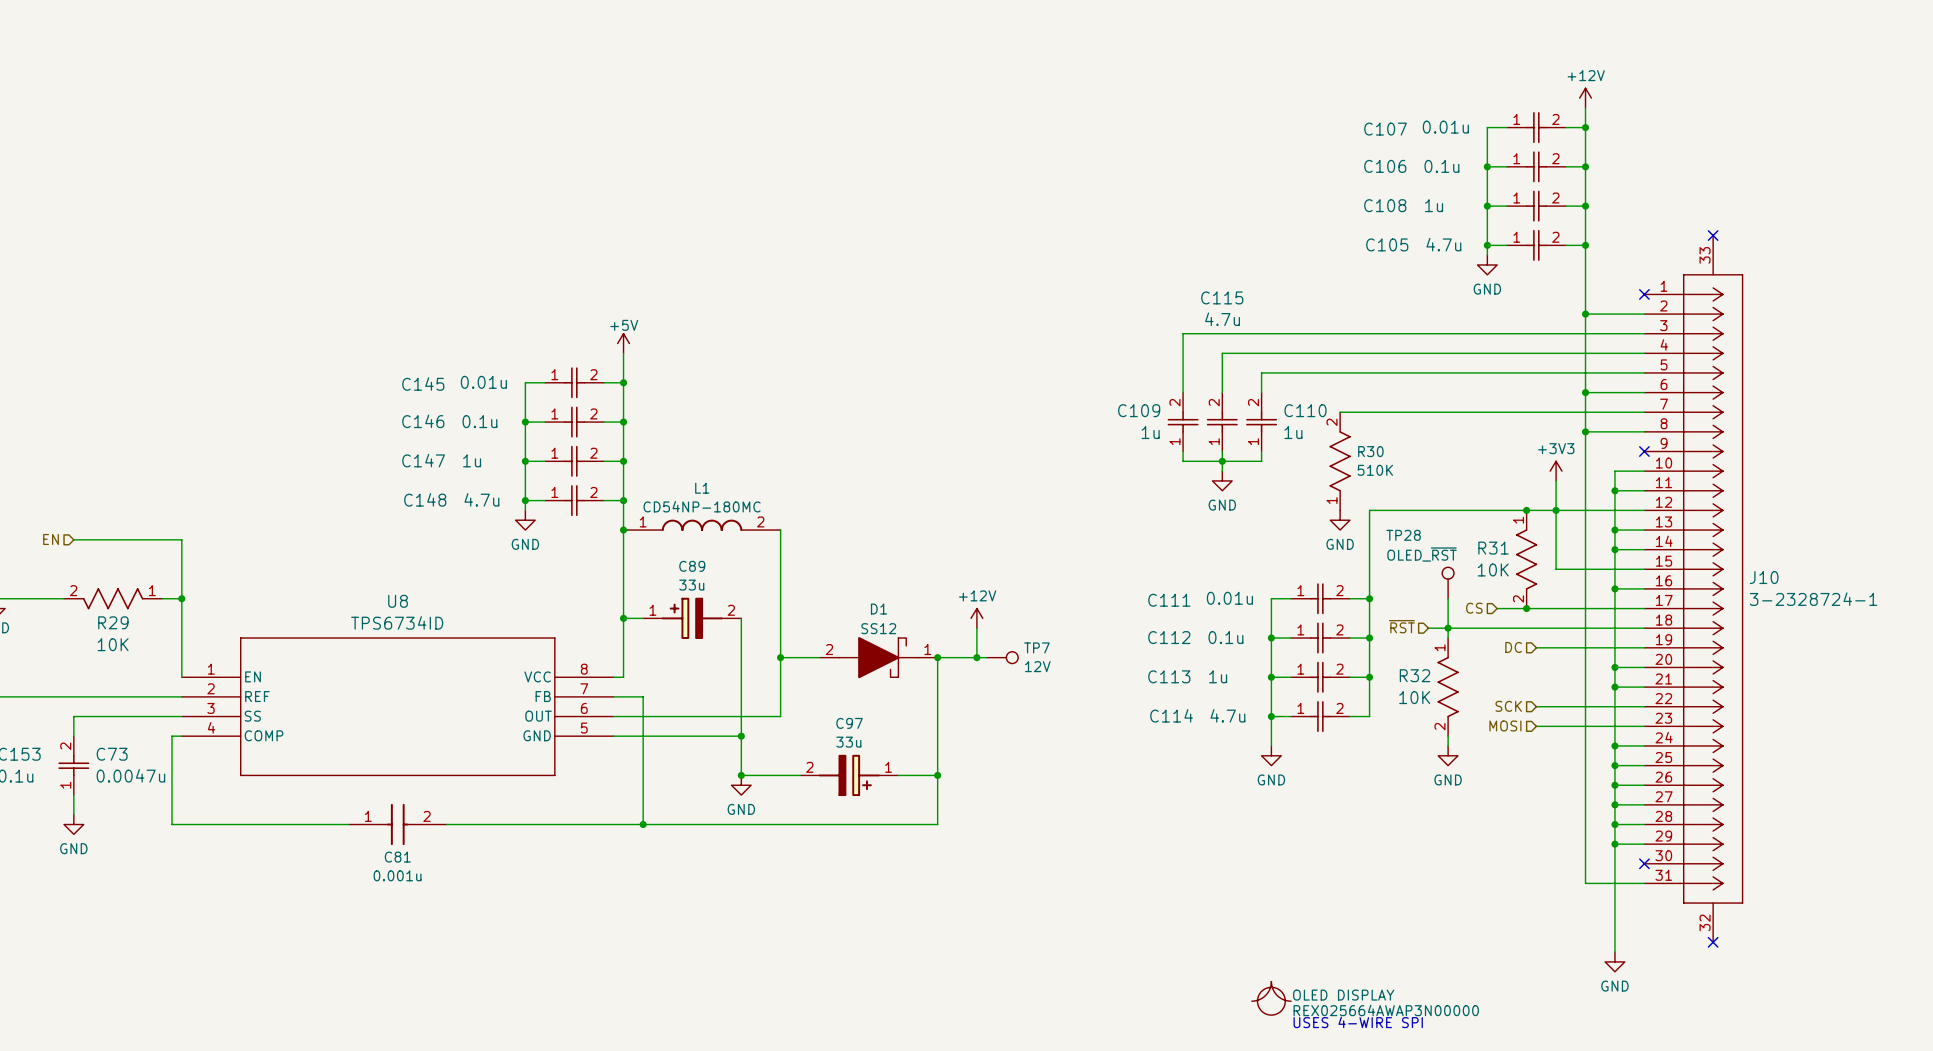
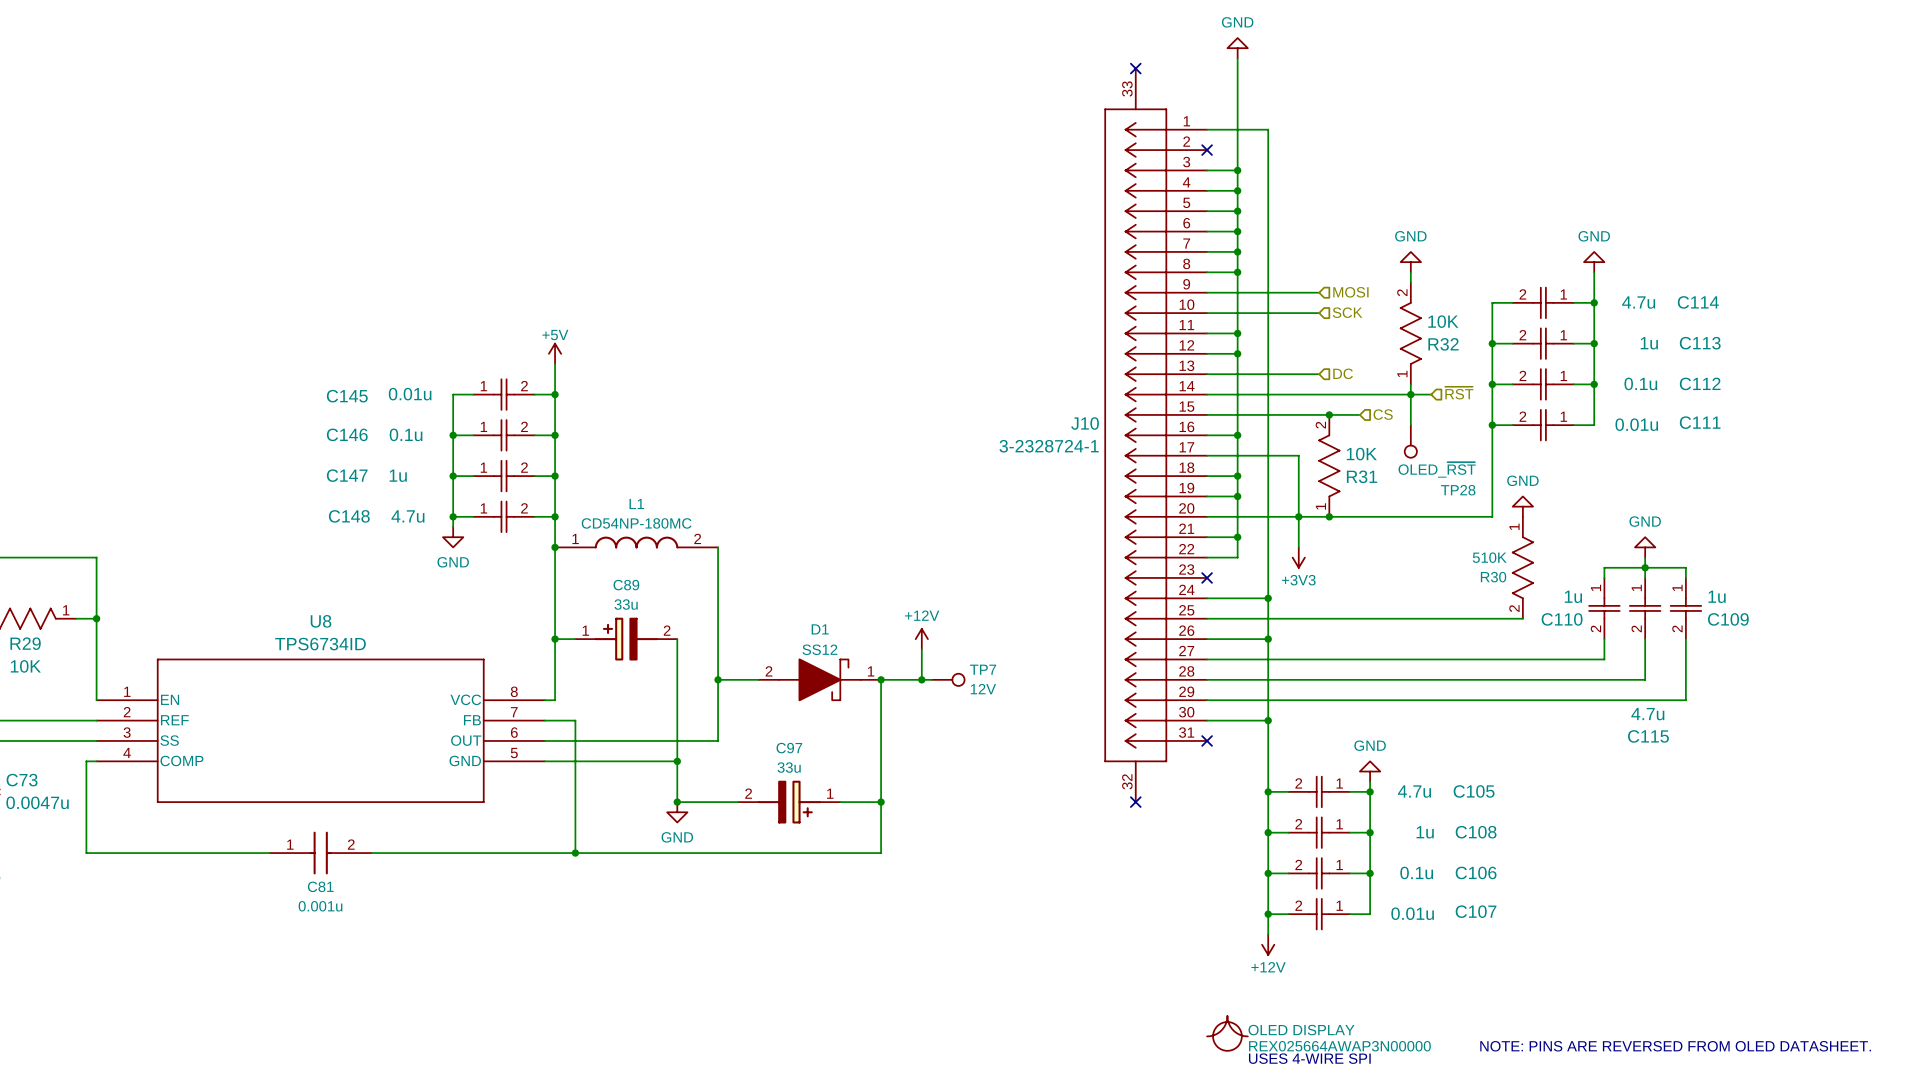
power symbol: none -> GND (1237, 48)
wire: none -> (1237, 58) (1237, 557) (1207, 557)
no-connect mark: none -> (1135, 68)
power symbol: +12V (1585, 98) -> none
wire: (1585, 107) (1585, 883) (1644, 883) -> none
wire: none -> (1207, 129) (1268, 129) (1268, 934)
wire: (1506, 127) (1487, 127) (1487, 255) -> none
C107 rotation: 0° (1536, 127) -> 180° (1319, 914)
C107 position: (1536, 127) -> (1319, 914)
wire: (1565, 127) (1585, 127) -> none
junction: (1585, 127) -> none
no-connect mark: none -> (1207, 150)
wire: none -> (1207, 170) (1237, 170)
junction: none -> (1237, 170)
wire: (1487, 166) (1506, 166) -> none
junction: (1487, 166) -> none
C106 rotation: 0° (1536, 166) -> 180° (1319, 873)
C106 position: (1536, 166) -> (1319, 873)
wire: (1565, 166) (1585, 166) -> none
junction: (1585, 166) -> none
wire: none -> (1207, 190) (1237, 190)
junction: none -> (1237, 190)
wire: none -> (1207, 211) (1237, 211)
junction: none -> (1237, 211)
wire: (1487, 206) (1506, 206) -> none
junction: (1487, 206) -> none
C108 rotation: 0° (1536, 206) -> 180° (1319, 832)
C108 position: (1536, 206) -> (1319, 832)
wire: (1565, 206) (1585, 206) -> none
junction: (1585, 206) -> none
wire: none -> (1207, 231) (1237, 231)
junction: none -> (1237, 231)
no-connect mark: (1713, 235) -> none
wire: none -> (1207, 251) (1237, 251)
junction: none -> (1237, 251)
wire: (1487, 245) (1506, 245) -> none
junction: (1487, 245) -> none
C105 rotation: 0° (1536, 245) -> 180° (1319, 791)
C105 position: (1536, 245) -> (1319, 791)
wire: (1565, 245) (1585, 245) -> none
junction: (1585, 245) -> none
power symbol: none -> GND (1594, 262)
wire: none -> (1207, 272) (1237, 272)
junction: none -> (1237, 272)
wire: none -> (1410, 272) (1410, 282)
power symbol rotation: 0° (1487, 264) -> 180° (1410, 262)
power symbol position: GND (1487, 264) -> GND (1410, 262)
wire: none -> (1207, 292) (1319, 292)
hierarchical label: none -> MOSI (1350, 292)
wire: none -> (1512, 302) (1492, 302) (1492, 516) (1207, 516)
junction: none -> (1594, 302)
no-connect mark: (1644, 294) -> none
hierarchical label: none -> SCK (1347, 312)
wire: none -> (1207, 313) (1319, 313)
wire: (1585, 314) (1644, 314) -> none
junction: (1585, 314) -> none
wire: none -> (1207, 333) (1237, 333)
junction: none -> (1237, 333)
wire: (1526, 333) (1183, 333) (1183, 392) -> none
junction: none -> (1492, 343)
wire: (1624, 333) (1644, 333) -> (1573, 302) (1594, 302)
junction: none -> (1594, 343)
wire: none -> (1207, 353) (1237, 353)
junction: none -> (1237, 353)
wire: (1644, 353) (1222, 353) (1222, 392) -> none
hierarchical label: none -> DC (1343, 373)
wire: none -> (1207, 374) (1319, 374)
wire: none -> (1410, 384) (1410, 425)
wire: (1526, 372) (1261, 372) (1261, 392) -> none
junction: none -> (1492, 384)
wire: (1624, 372) (1644, 372) -> none
junction: none -> (1594, 384)
hierarchical label: none -> ~{RST} (1459, 393)
wire: none -> (1207, 394) (1431, 394)
junction: none -> (1410, 394)
wire: (1585, 392) (1644, 392) -> none
junction: (1585, 392) -> none
wire: none -> (1207, 414) (1359, 414)
junction: none -> (1329, 414)
hierarchical label: none -> CS (1383, 414)
wire: (1340, 412) (1526, 412) -> (1329, 618) (1522, 618)
junction: none -> (1492, 425)
wire: (1624, 412) (1644, 412) -> (1594, 425) (1594, 272)
C109 rotation: 0° (1183, 422) -> 180° (1685, 608)
C109 position: (1183, 422) -> (1685, 608)
C115 rotation: 0° (1222, 422) -> 180° (1645, 608)
C115 position: (1222, 422) -> (1645, 608)
wire: none -> (1207, 435) (1237, 435)
C110 rotation: 0° (1261, 422) -> 180° (1604, 608)
C110 position: (1261, 422) -> (1604, 608)
junction: none -> (1237, 435)
wire: (1585, 431) (1644, 431) -> none
junction: (1585, 431) -> none
wire: none -> (1207, 455) (1298, 455) (1298, 547)
wire: (1222, 451) (1222, 471) -> none
wire: (1261, 451) (1261, 461) -> (1237, 476) (1217, 476)
no-connect mark: (1644, 451) -> none
junction: (1222, 461) -> none
junction: none -> (1237, 476)
R30 rotation: 0° (1340, 461) -> 180° (1522, 567)
R30 position: (1340, 461) -> (1522, 567)
power symbol: +3V3 (1556, 471) -> none
wire: (1644, 471) (1614, 471) (1614, 952) -> none
power symbol: GND (1222, 480) -> none
wire: none -> (1207, 496) (1237, 496)
junction: none -> (1237, 496)
wire: (1556, 480) (1556, 569) (1644, 569) -> none
power symbol: none -> GND (1522, 506)
wire: (1614, 490) (1644, 490) -> none
junction: (1614, 490) -> none
junction: none -> (1298, 516)
junction: none -> (1329, 516)
junction: (1526, 510) -> none
junction: (1556, 510) -> none
wire: (1644, 510) (1369, 510) (1369, 716) (1349, 716) -> none
wire: none -> (1207, 537) (1237, 537)
junction: none -> (1237, 537)
power symbol: GND (1340, 520) -> none
wire: (1614, 530) (1644, 530) -> none
junction: (1614, 530) -> none
power symbol: none -> GND (1645, 547)
power symbol: none -> +3V3 (1298, 557)
wire: none -> (1645, 557) (1645, 577)
wire: (1614, 549) (1634, 549) -> (1604, 577) (1604, 567)
junction: (1614, 549) -> none
junction: none -> (1645, 567)
no-connect mark: none -> (1207, 577)
R31 rotation: 0° (1526, 559) -> 180° (1329, 465)
R31 position: (1526, 559) -> (1329, 465)
TP28 rotation: 0° (1448, 573) -> 180° (1410, 451)
wire: none -> (1207, 598) (1268, 598)
junction: none -> (1268, 598)
TP28 position: (1448, 583) -> (1410, 441)
wire: (1614, 588) (1644, 588) -> none
junction: (1614, 588) -> none
J10 position: (1693, 588) -> (1155, 435)
J10 flip: as is (1713, 588) -> left-right (1135, 435)
wire: (1271, 598) (1271, 745) -> (1227, 618) (1207, 618)
C111 rotation: 0° (1320, 598) -> 180° (1543, 425)
C111 position: (1320, 598) -> (1543, 425)
junction: (1369, 598) -> none
wire: (1448, 598) (1448, 638) -> none
hierarchical label: CS (1474, 608) -> none
wire: (1497, 608) (1644, 608) -> none
junction: (1526, 608) -> none
wire: none -> (1207, 639) (1268, 639)
junction: none -> (1268, 639)
wire: none -> (1604, 639) (1604, 659) (1329, 659)
wire: none -> (1645, 639) (1645, 679) (1207, 679)
wire: none -> (1685, 639) (1685, 700) (1329, 700)
hierarchical label: ~{RST} (1401, 626) -> none
wire: (1428, 628) (1644, 628) -> none
junction: (1448, 628) -> none
wire: none -> (1207, 659) (1227, 659)
junction: (1271, 638) -> none
C112 rotation: 0° (1320, 638) -> 180° (1543, 384)
C112 position: (1320, 638) -> (1543, 384)
junction: (1369, 638) -> none
hierarchical label: DC (1513, 647) -> none
wire: (1536, 647) (1644, 647) -> none
wire: (1614, 667) (1644, 667) -> none
junction: (1614, 667) -> none
junction: (1271, 677) -> none
C113 rotation: 0° (1320, 677) -> 180° (1543, 343)
C113 position: (1320, 677) -> (1543, 343)
junction: (1369, 677) -> none
R32 rotation: 0° (1448, 687) -> 180° (1410, 333)
R32 position: (1448, 687) -> (1410, 333)
wire: (1614, 687) (1644, 687) -> none
junction: (1614, 687) -> none
wire: none -> (1207, 720) (1268, 720)
junction: none -> (1268, 720)
hierarchical label: SCK (1508, 706) -> none
wire: (1536, 706) (1644, 706) -> none
no-connect mark: none -> (1207, 740)
wire: (1271, 716) (1291, 716) -> (1207, 700) (1227, 700)
junction: (1271, 716) -> none
C114 rotation: 0° (1320, 716) -> 180° (1543, 302)
C114 position: (1320, 716) -> (1543, 302)
hierarchical label: MOSI (1505, 725) -> none
wire: (1536, 726) (1644, 726) -> none
wire: (1448, 736) (1448, 745) -> none
wire: (1614, 745) (1644, 745) -> none
junction: (1614, 745) -> none
power symbol: GND (1271, 755) -> none
wire: none -> (1370, 781) (1370, 914) (1349, 914)
power symbol rotation: 0° (1448, 755) -> 180° (1370, 771)
power symbol position: GND (1448, 755) -> GND (1370, 771)
wire: none -> (1268, 791) (1288, 791)
junction: none -> (1268, 791)
wire: none -> (1349, 791) (1370, 791)
junction: none -> (1370, 791)
wire: (1614, 765) (1644, 765) -> none
junction: (1614, 765) -> none
no-connect mark: none -> (1135, 802)
wire: (1614, 785) (1644, 785) -> none
junction: (1614, 785) -> none
wire: none -> (1268, 832) (1288, 832)
junction: none -> (1268, 832)
wire: none -> (1349, 832) (1370, 832)
junction: none -> (1370, 832)
wire: (1614, 804) (1644, 804) -> none
junction: (1614, 804) -> none
wire: (1614, 824) (1644, 824) -> none
junction: (1614, 824) -> none
wire: none -> (1268, 873) (1288, 873)
junction: none -> (1268, 873)
wire: none -> (1349, 873) (1370, 873)
junction: none -> (1370, 873)
wire: (1614, 844) (1644, 844) -> none
junction: (1614, 844) -> none
no-connect mark: (1644, 863) -> none
wire: none -> (1268, 914) (1288, 914)
junction: none -> (1268, 914)
power symbol: none -> +12V (1268, 944)
no-connect mark: (1713, 942) -> none
power symbol: GND (1614, 961) -> none
text: none -> NOTE: PINS ARE REVERSED FROM OLED DATASHEET. (1675, 1046)

